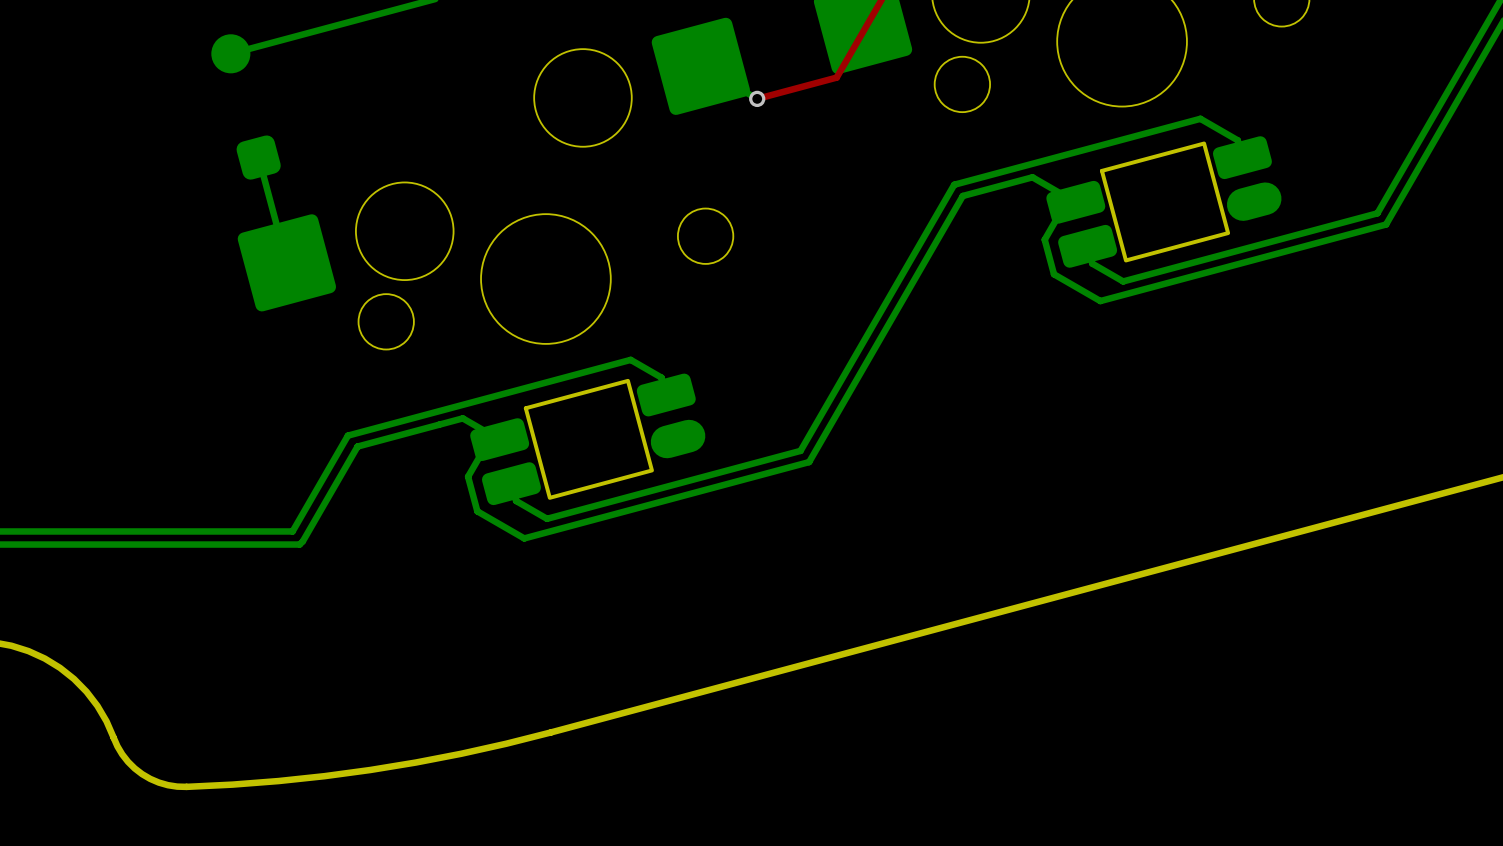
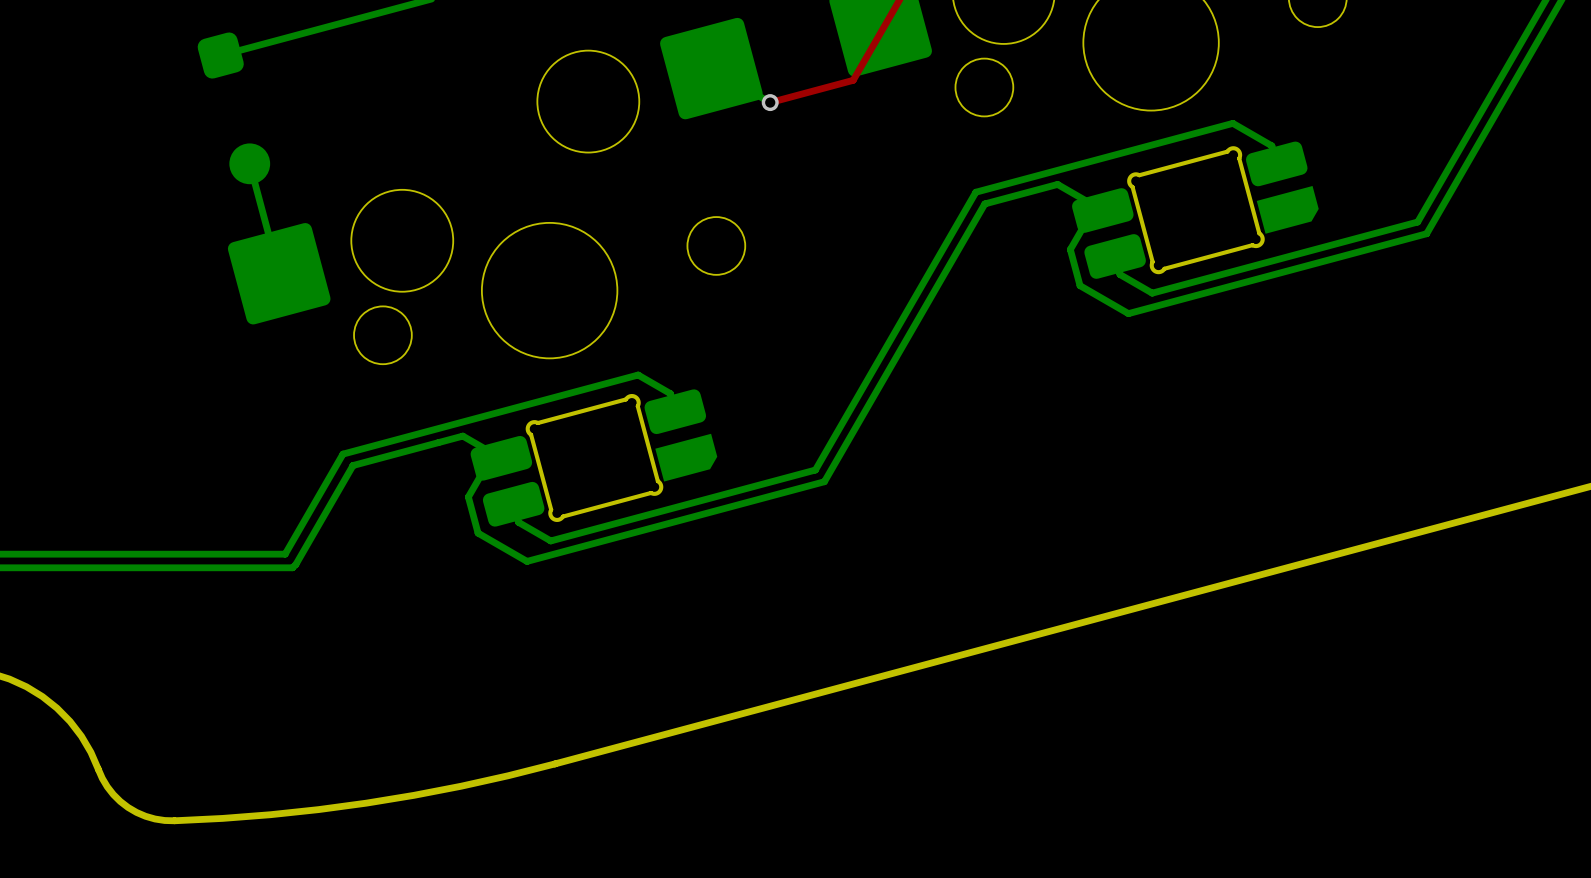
part rotation: 0° (246, 106) -> 180° (233, 108)
part footprint: [1046, 136, 1282, 268] -> [1072, 141, 1319, 279]
part footprint: [470, 373, 706, 506] -> [470, 389, 718, 527]

